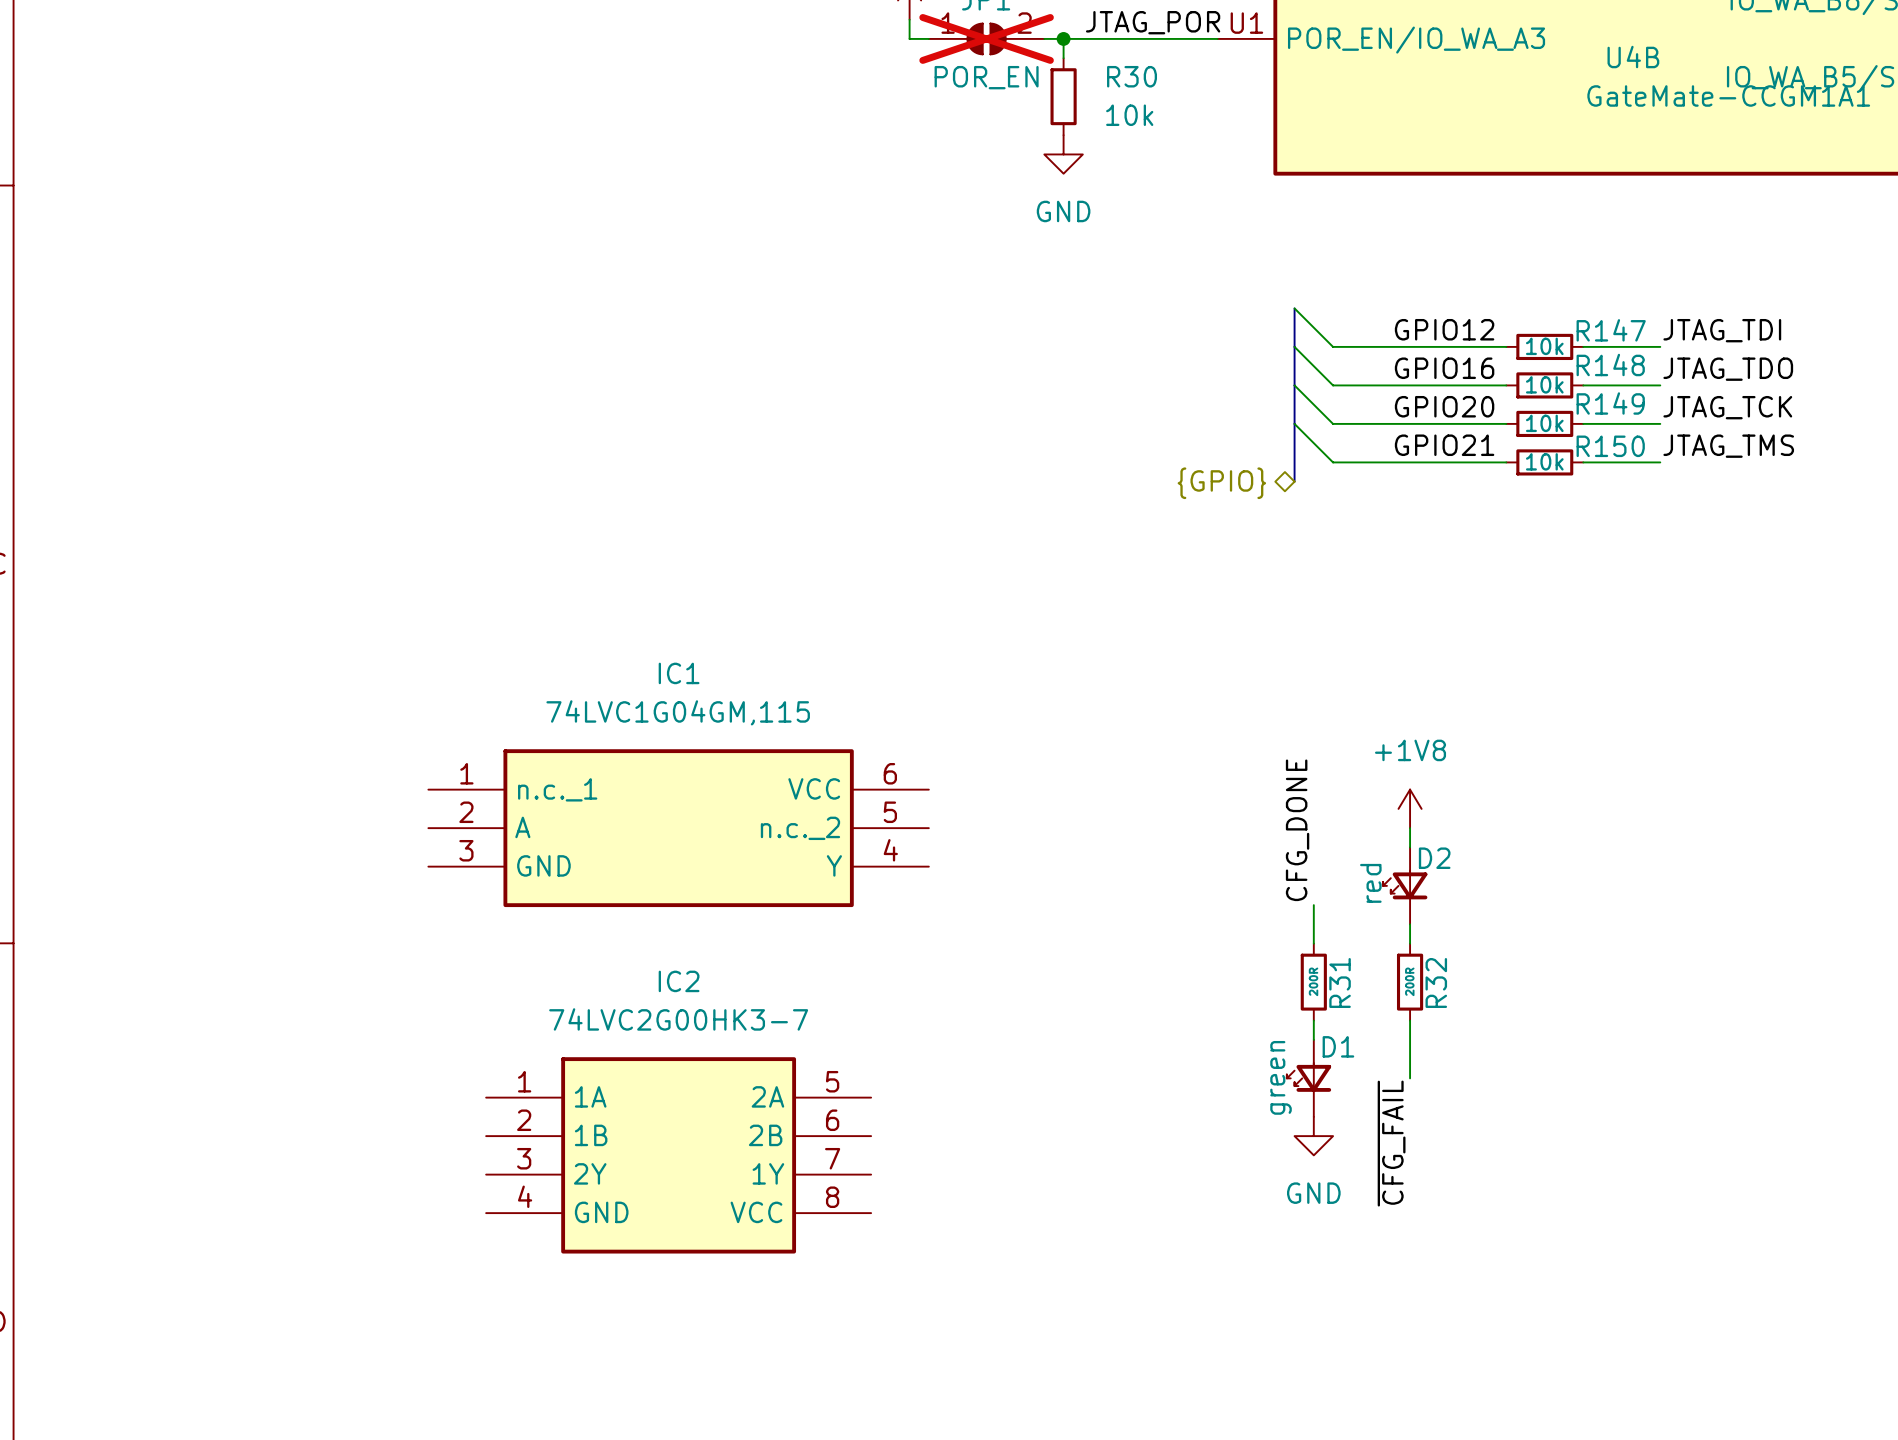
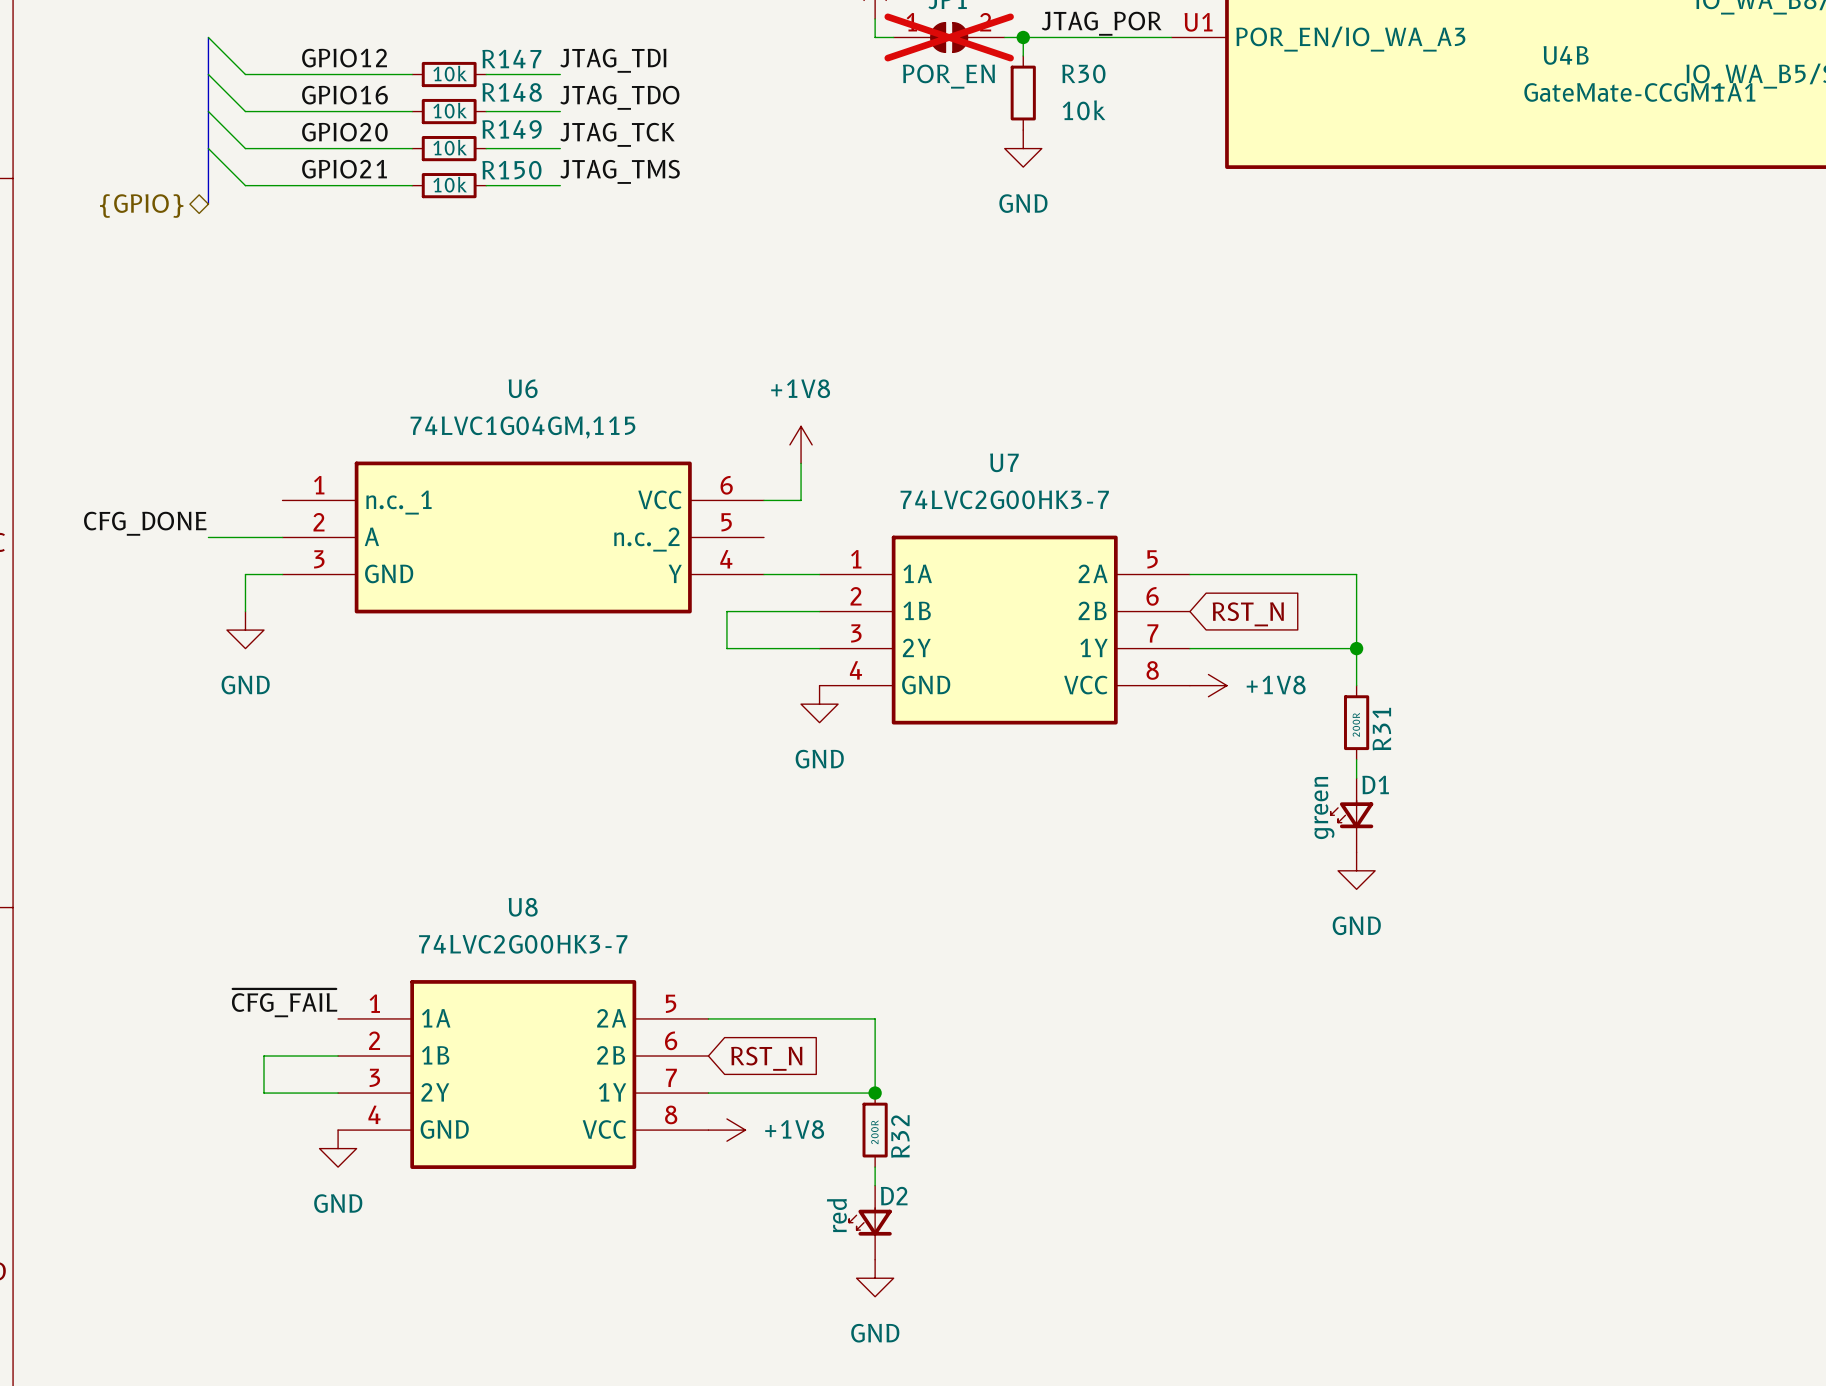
wire: none -> (208, 37) (245, 74) (412, 74)
bus: none -> (208, 37) (208, 204)
label: none -> GPIO12 (344, 58)
label: none -> JTAG_TDI (613, 60)
wire: none -> (208, 74) (245, 111) (412, 111)
wire: none -> (486, 74) (560, 74)
label: none -> GPIO16 (344, 95)
label: none -> JTAG_TDO (619, 97)
wire: none -> (208, 111) (245, 148) (412, 148)
wire: none -> (486, 111) (560, 111)
label: none -> GPIO20 (344, 132)
label: none -> JTAG_TCK (617, 134)
wire: none -> (208, 148) (245, 185) (412, 185)
wire: none -> (486, 148) (560, 148)
label: none -> GPIO21 (344, 169)
label: none -> JTAG_TMS (620, 171)
wire: none -> (486, 185) (560, 185)
hierarchical label: none -> {GPIO} (141, 206)
wire: (1294, 308) (1333, 346) (1506, 346) -> none
bus: (1294, 308) (1294, 481) -> none
label: GPIO12 (1444, 329) -> none
label: JTAG_TDI (1722, 330) -> none
wire: (1294, 346) (1333, 385) (1506, 385) -> none
R147 position: (1544, 346) -> (449, 74)
wire: (1583, 346) (1660, 346) -> none
label: GPIO16 (1444, 368) -> none
label: JTAG_TDO (1728, 369) -> none
wire: (1294, 385) (1333, 423) (1506, 423) -> none
R148 position: (1544, 385) -> (449, 111)
wire: (1583, 385) (1660, 385) -> none
label: GPIO20 (1444, 406) -> none
label: JTAG_TCK (1727, 407) -> none
wire: (1294, 423) (1333, 462) (1506, 462) -> none
R149 position: (1544, 423) -> (449, 148)
wire: (1583, 423) (1660, 423) -> none
label: GPIO21 (1444, 445) -> none
label: JTAG_TMS (1728, 446) -> none
power symbol: none -> +1V8 (801, 444)
R150 position: (1544, 462) -> (449, 185)
wire: (1583, 462) (1660, 462) -> none
wire: none -> (801, 463) (801, 500) (764, 500)
hierarchical label: {GPIO} (1221, 483) -> none
label: none -> CFG_DONE (145, 523)
wire: none -> (208, 537) (282, 537)
U6: none -> 74LVC1G04GM,115 (523, 537)
wire: none -> (282, 574) (245, 574) (245, 611)
wire: none -> (764, 574) (819, 574)
wire: none -> (1189, 574) (1356, 574) (1356, 685)
wire: none -> (819, 611) (726, 611) (726, 648) (819, 648)
global label: none -> RST_N (1248, 614)
power symbol: none -> GND (245, 630)
U7: none -> 74LVC2G00HK3-7 (1004, 630)
wire: none -> (1189, 648) (1356, 648)
junction: none -> (1356, 648)
power symbol: none -> GND (819, 704)
power symbol rotation: 0° (1410, 808) -> 90° clockwise (1208, 685)
power symbol position: +1V8 (1410, 808) -> +1V8 (1208, 685)
IC1: 74LVC1G04GM,115 (678, 828) -> none
label: CFG_DONE (1297, 830) -> none
D2 position: (1405, 885) -> (870, 1222)
wire: (1313, 905) (1313, 943) -> none
power symbol: none -> GND (1356, 870)
wire: (1410, 924) (1410, 943) -> none
R31 position: (1313, 982) -> (1356, 722)
R32 position: (1410, 982) -> (875, 1130)
wire: (1313, 1020) (1313, 1039) -> none
wire: (1410, 1020) (1410, 1078) -> none
label: none -> ~{CFG_FAIL} (284, 1003)
wire: none -> (708, 1018) (875, 1018) (875, 1093) (708, 1093)
D1 position: (1309, 1078) -> (1351, 815)
wire: none -> (338, 1056) (263, 1056) (263, 1093) (338, 1093)
global label: none -> RST_N (766, 1058)
U8: none -> 74LVC2G00HK3-7 (523, 1074)
junction: none -> (875, 1093)
power symbol: GND (1313, 1136) -> none
label: ~{CFG_FAIL} (1391, 1143) -> none
IC2: 74LVC2G00HK3-7 (678, 1155) -> none
power symbol: none -> +1V8 (726, 1130)
power symbol: none -> GND (338, 1148)
wire: none -> (875, 1167) (875, 1185)
power symbol: none -> GND (875, 1278)

